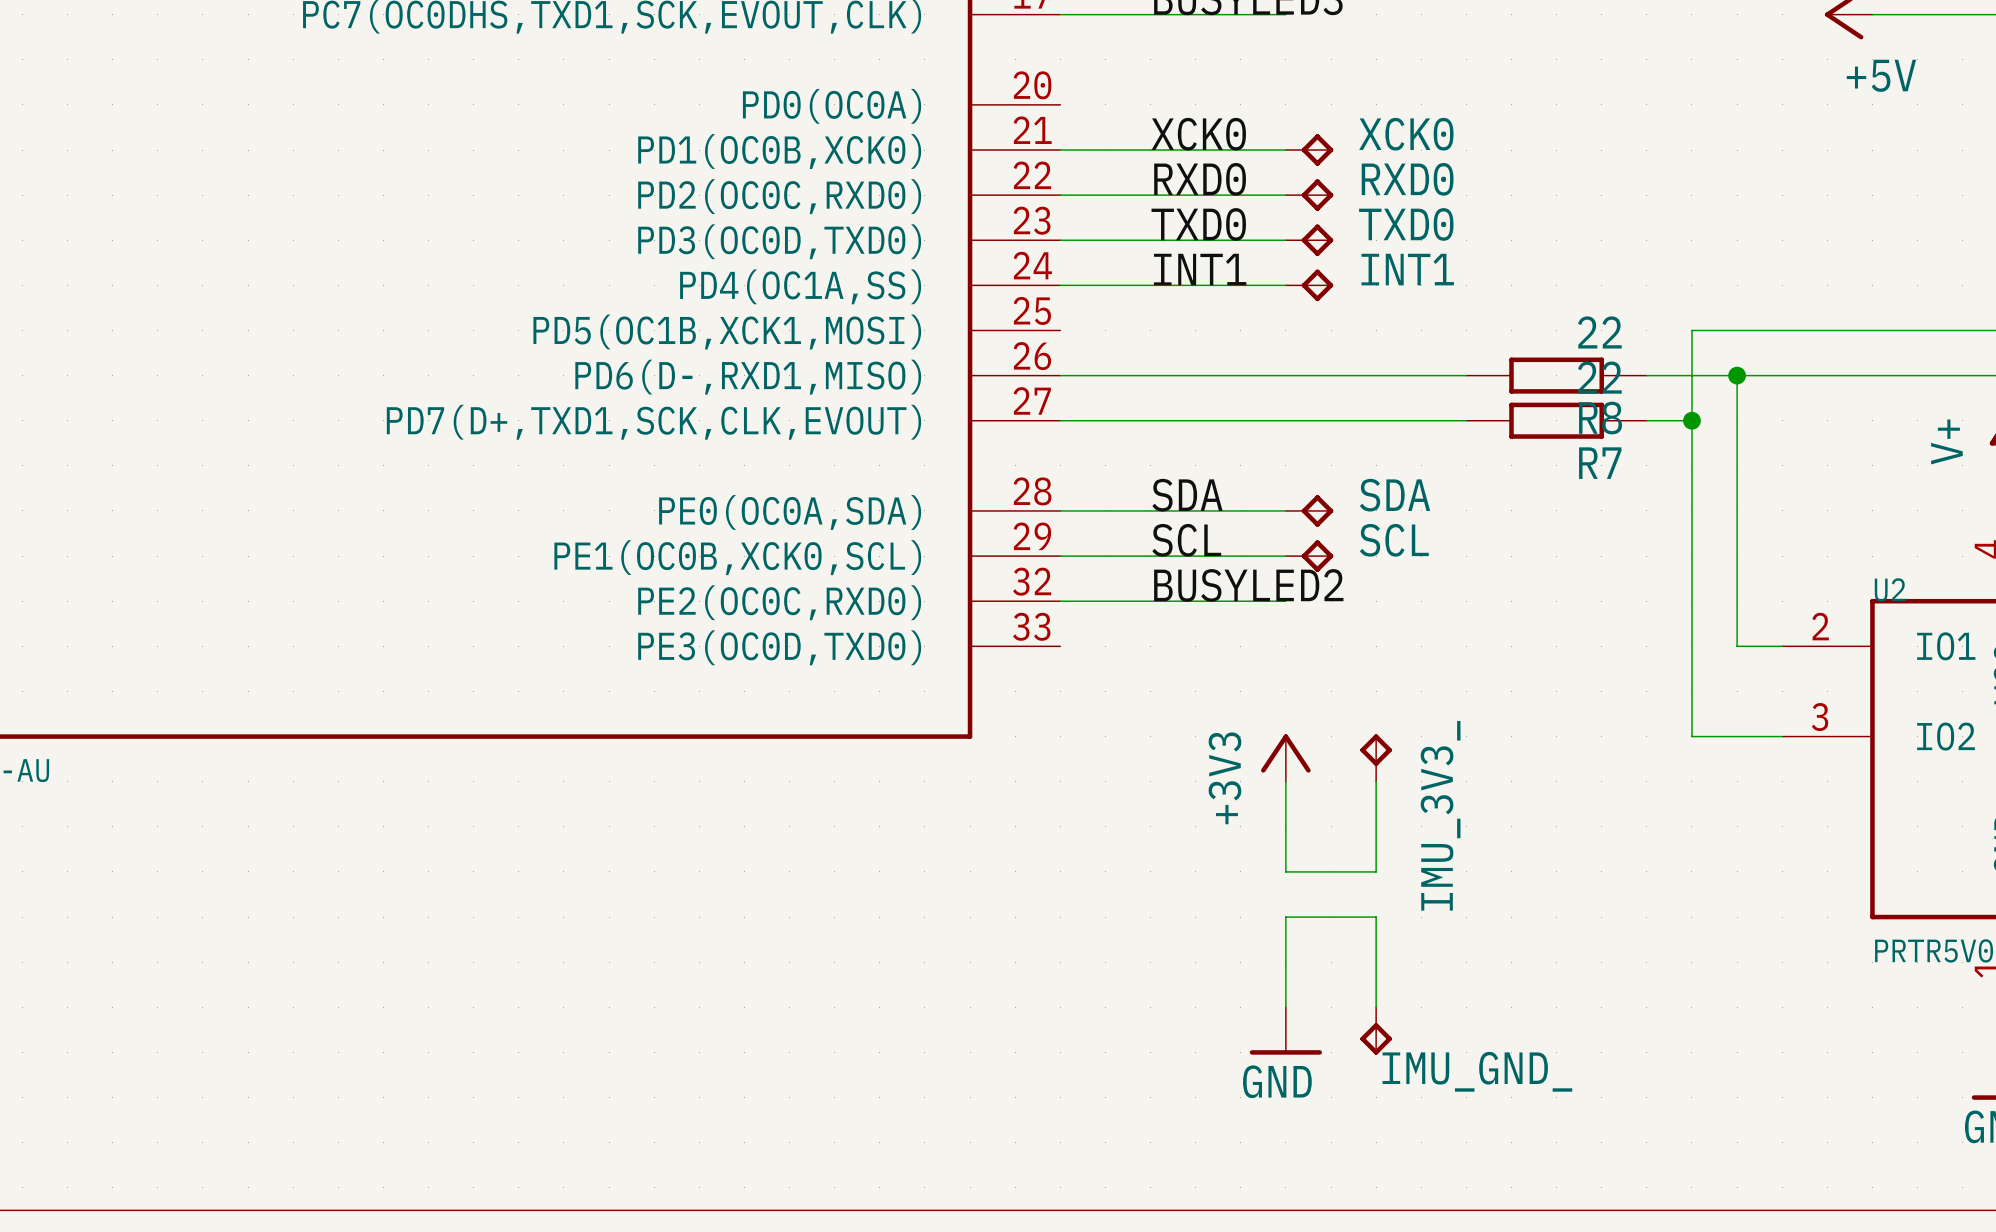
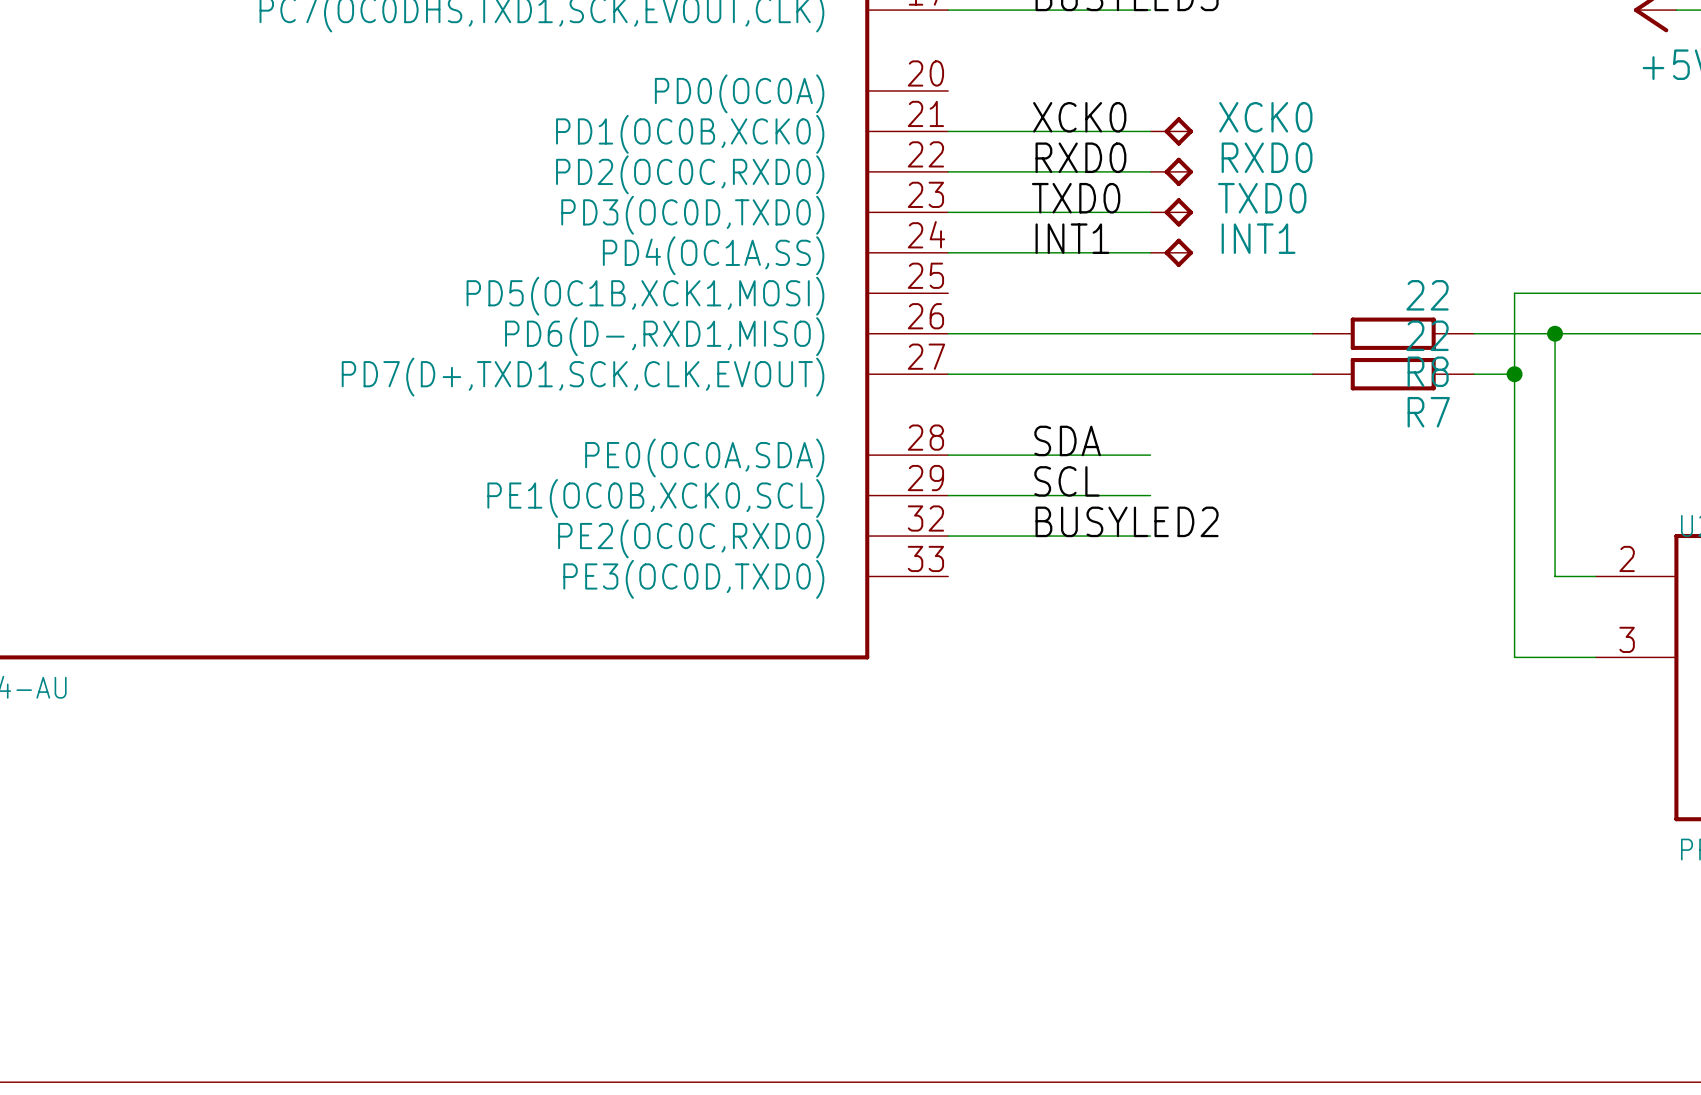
SDA: (1309, 510) -> none
SCL: (1309, 556) -> none
power symbol: +3V3 (1285, 758) -> none
IMU_3V3_: (1376, 758) -> none
wire: (1285, 781) (1285, 871) (1376, 871) (1376, 781) -> none
wire: (1285, 1007) (1285, 917) (1376, 917) (1376, 1007) -> none
power symbol: GND (1285, 1030) -> none
IMU_GND_: (1376, 1030) -> none

